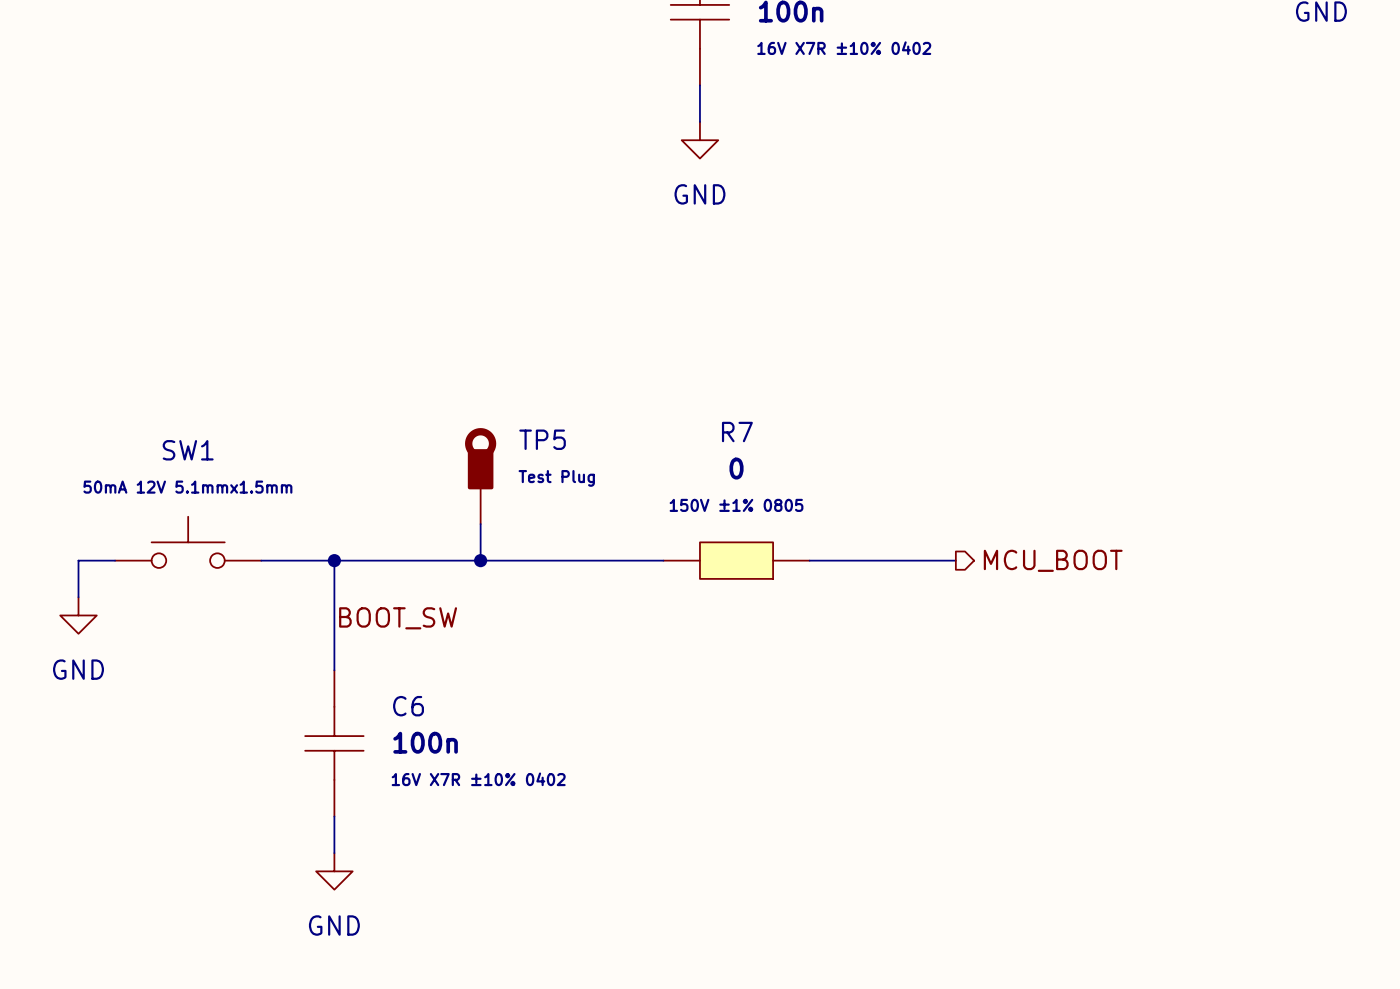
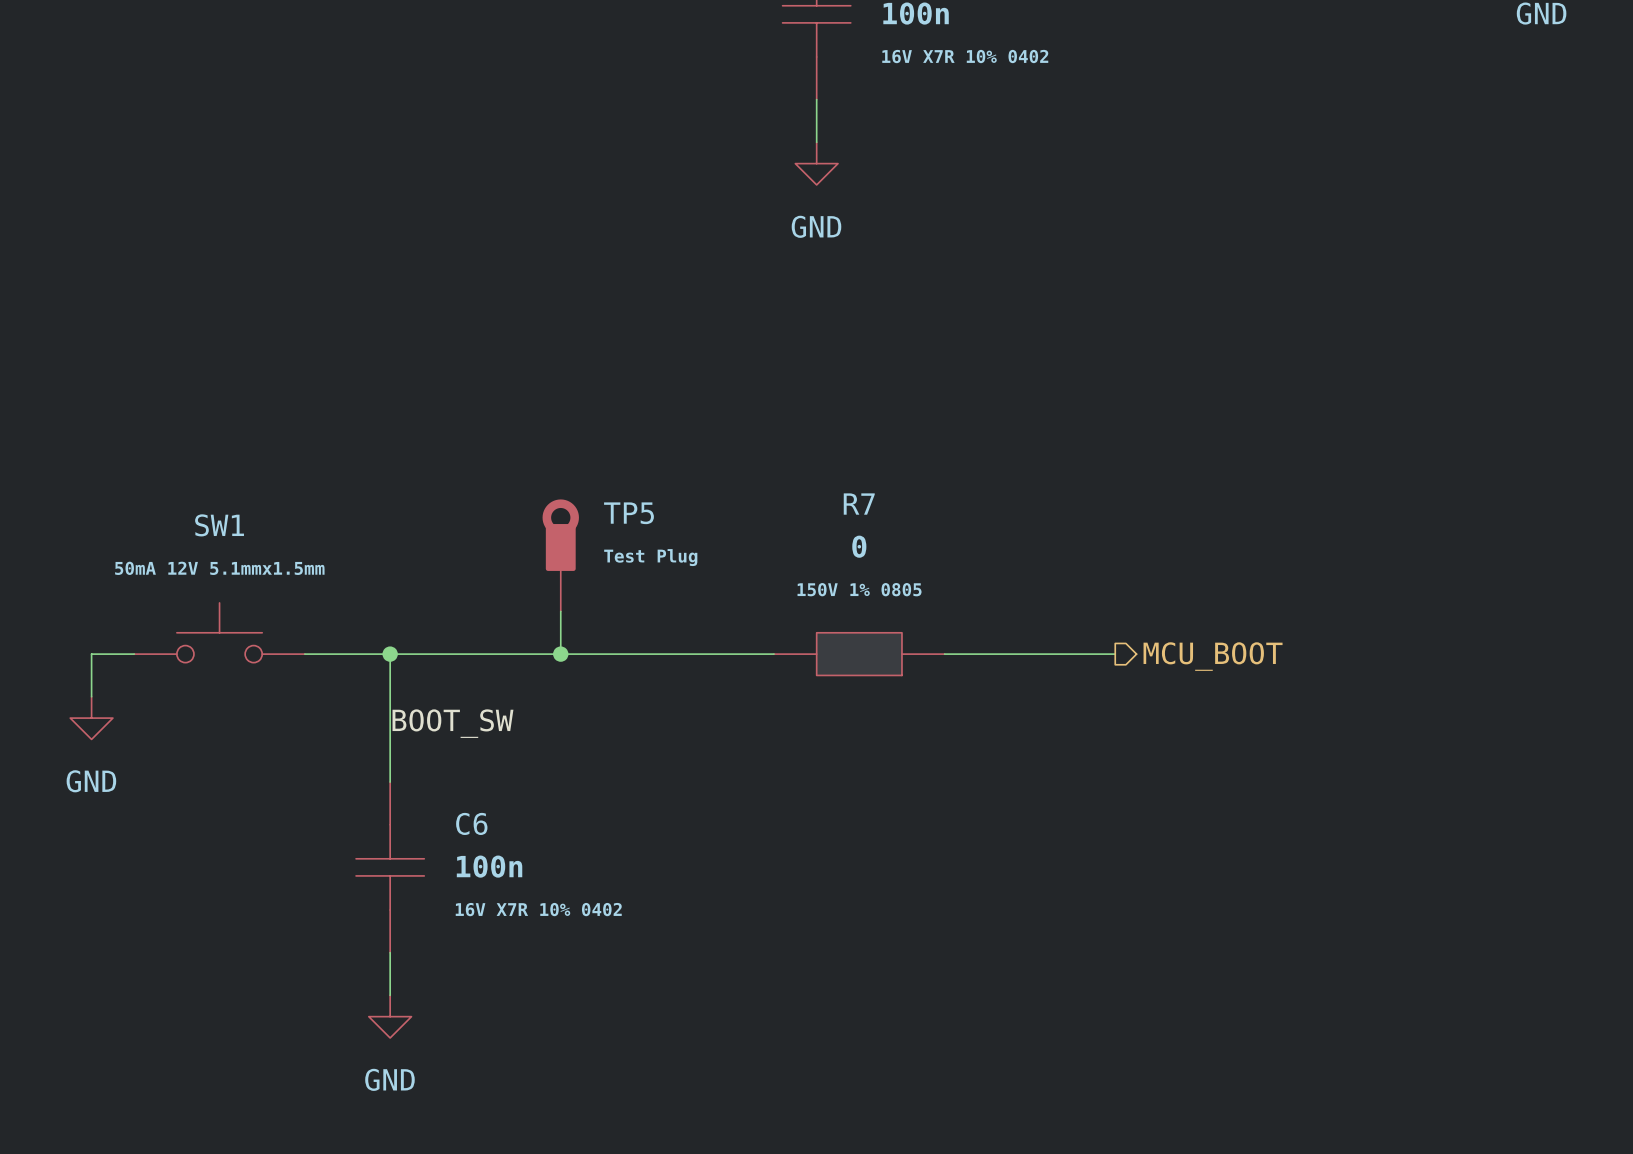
part text: 16V X7R ±10% 0402 (844, 48) -> 16V X7R 10% 0402 (965, 56)
R7 text: 150V ±1% 0805 (736, 505) -> 150V 1% 0805 (859, 589)
C6 text: 16V X7R ±10% 0402 (478, 779) -> 16V X7R 10% 0402 (538, 909)

